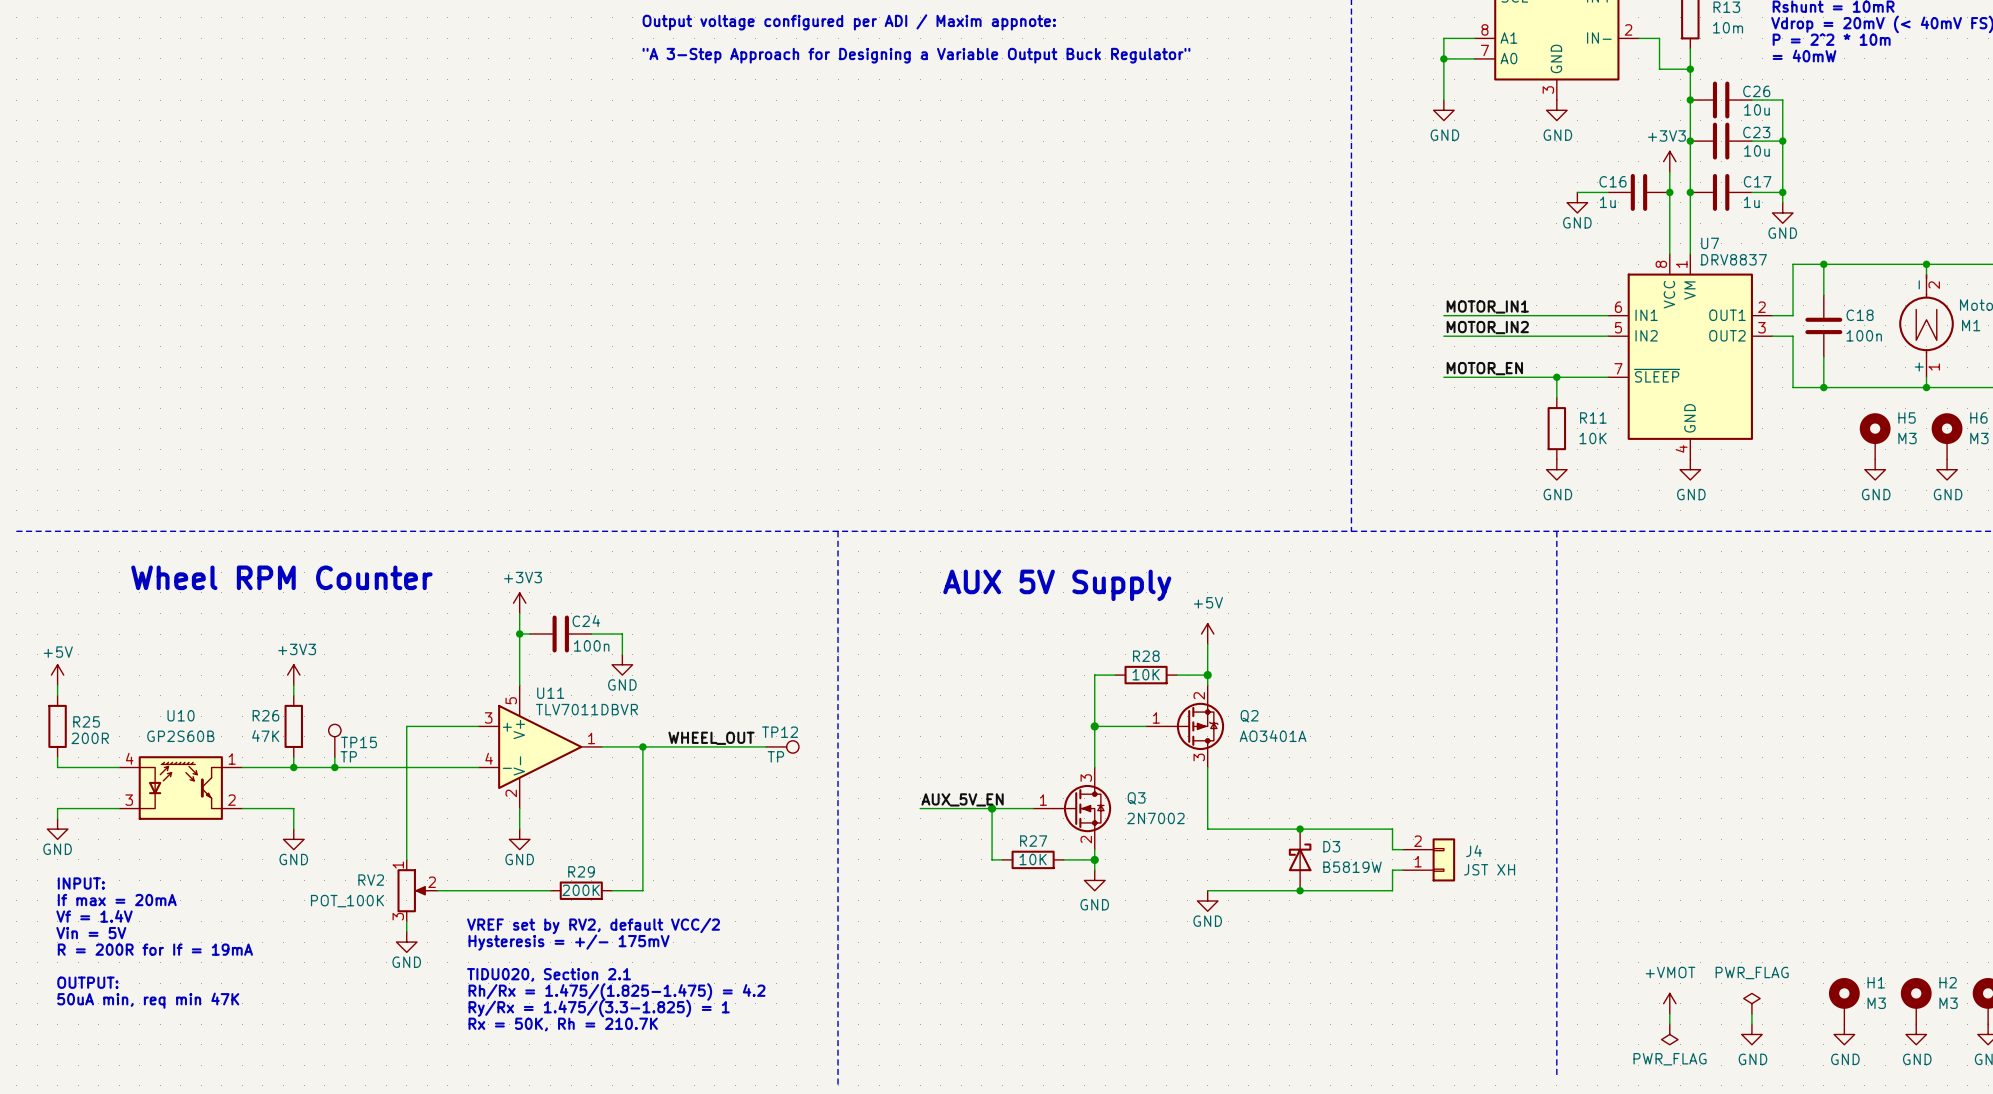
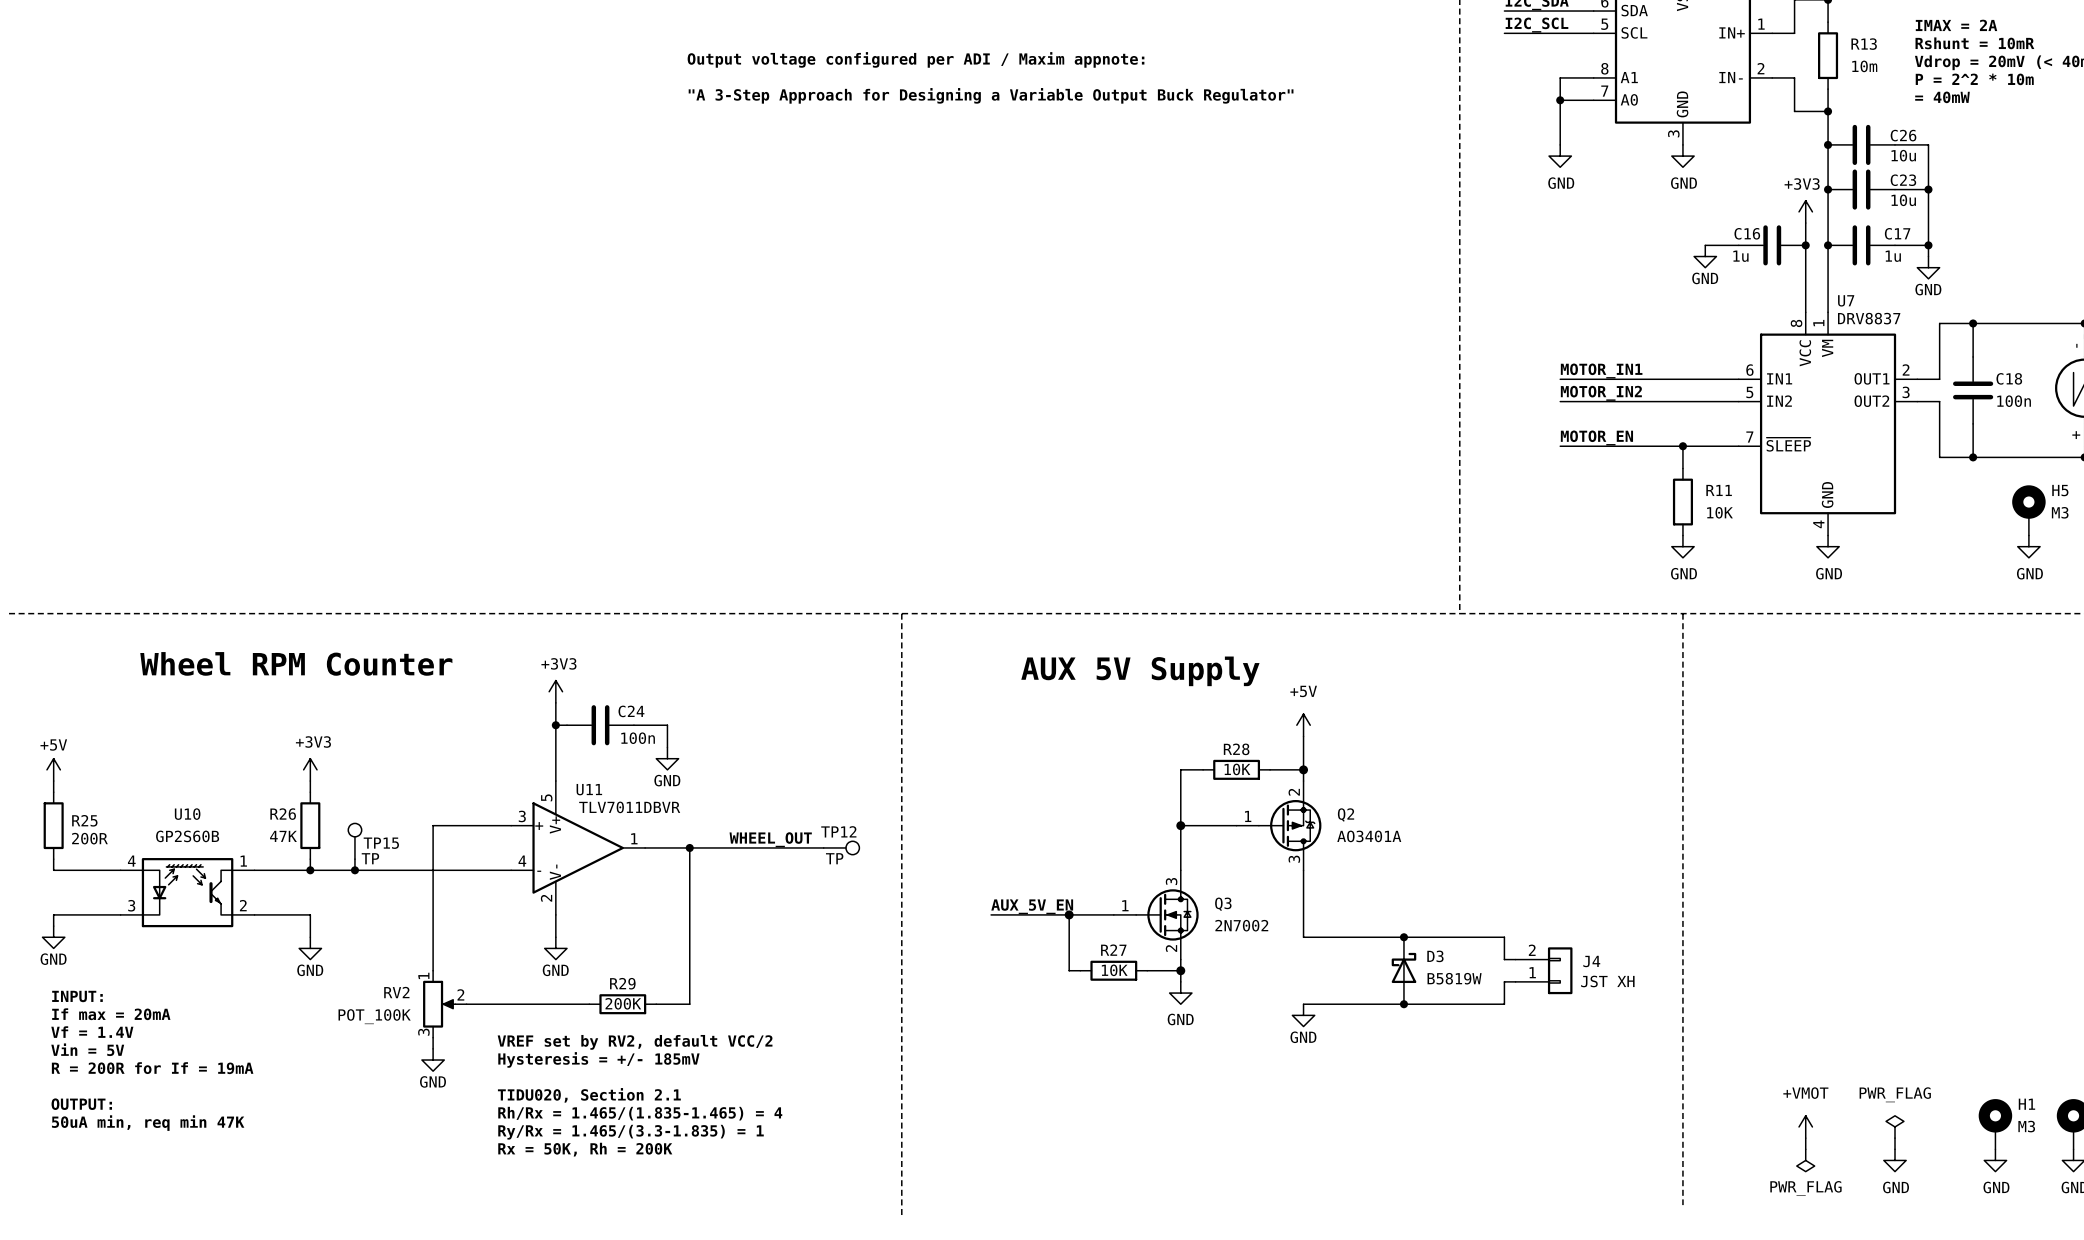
text: Hysteresis = +/- 175mV (569, 942) -> Hysteresis = +/- 185mV (598, 1059)
text: Rh/Rx = 1.475/(1.825-1.475) = 4.2 (616, 991) -> Rh/Rx = 1.465/(1.835-1.465) = 4 (640, 1113)
text: Ry/Rx = 1.475/(3.3-1.825) = 1 (599, 1008) -> Ry/Rx = 1.465/(3.3-1.835) = 1 (631, 1132)
text: Rx = 50K, Rh = 210.7K (563, 1024) -> Rx = 50K, Rh = 200K (585, 1149)

